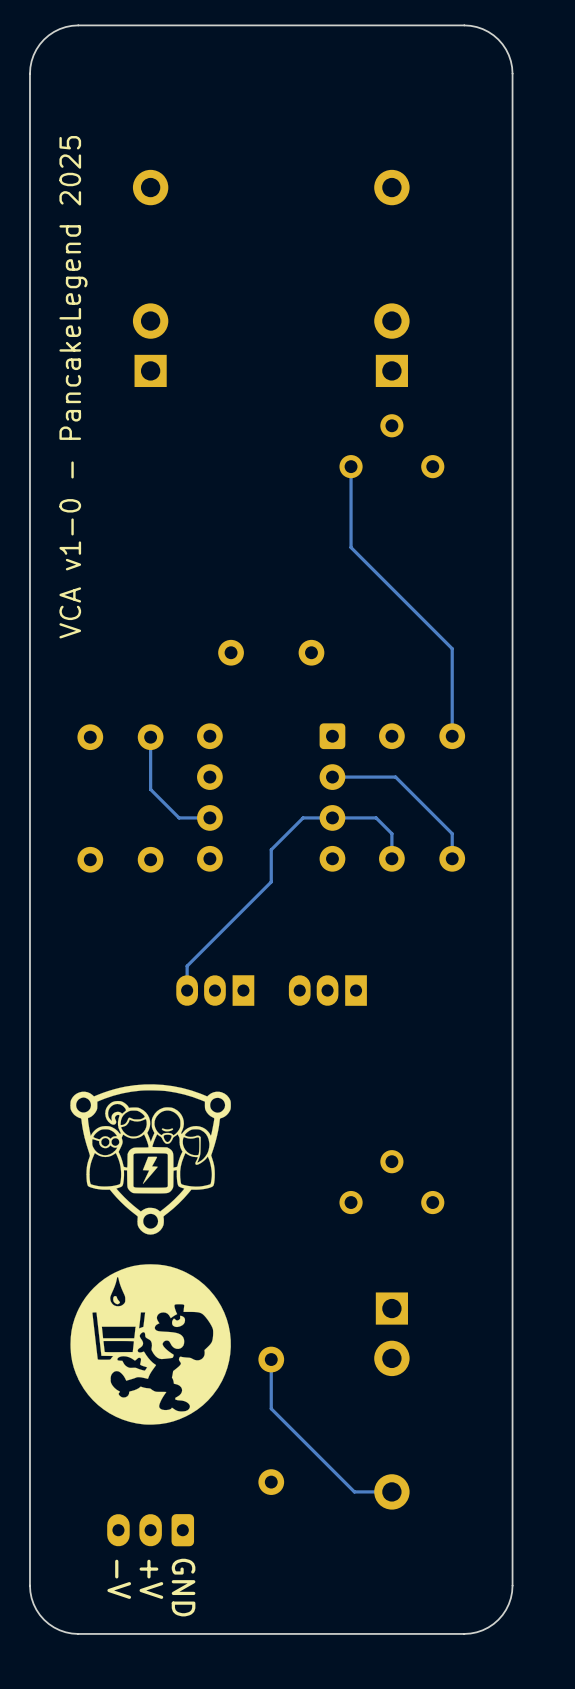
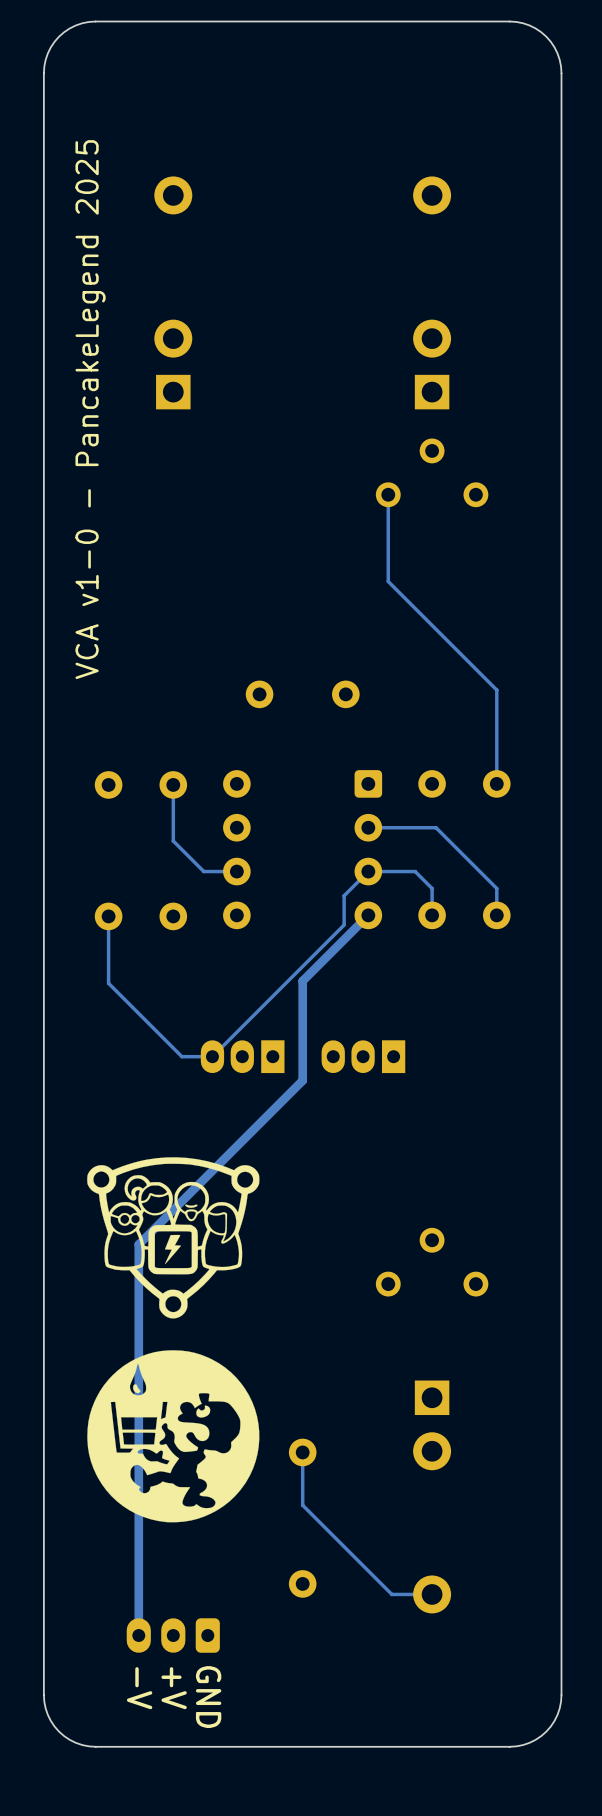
track: (332, 817) (303, 817) (271, 849) (271, 881) (187, 966) (187, 990) -> (368, 871) (344, 895) (344, 925) (212, 1056) (181, 1056) (108, 983) (108, 916)
track: none -> (368, 915) (302, 981) (302, 1080) (138, 1244) (138, 1635)

